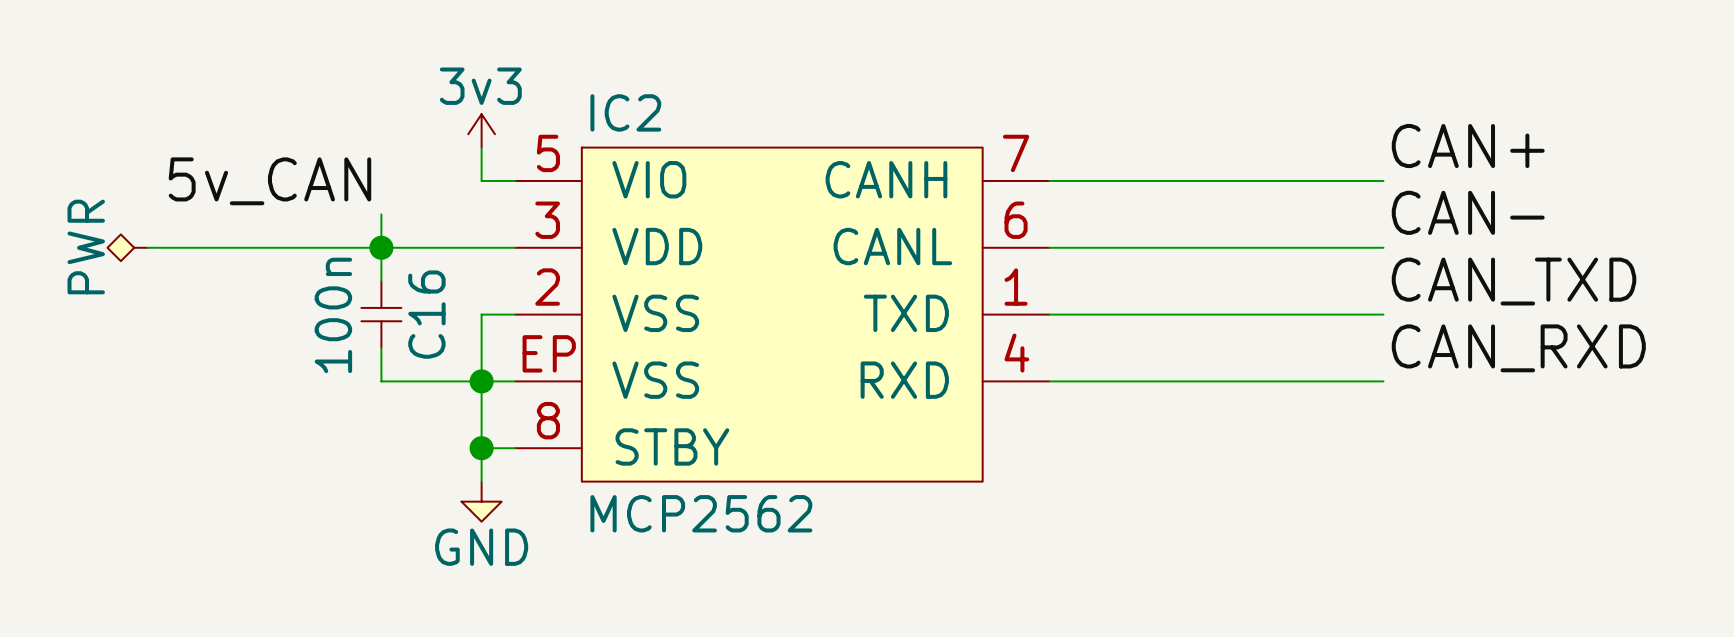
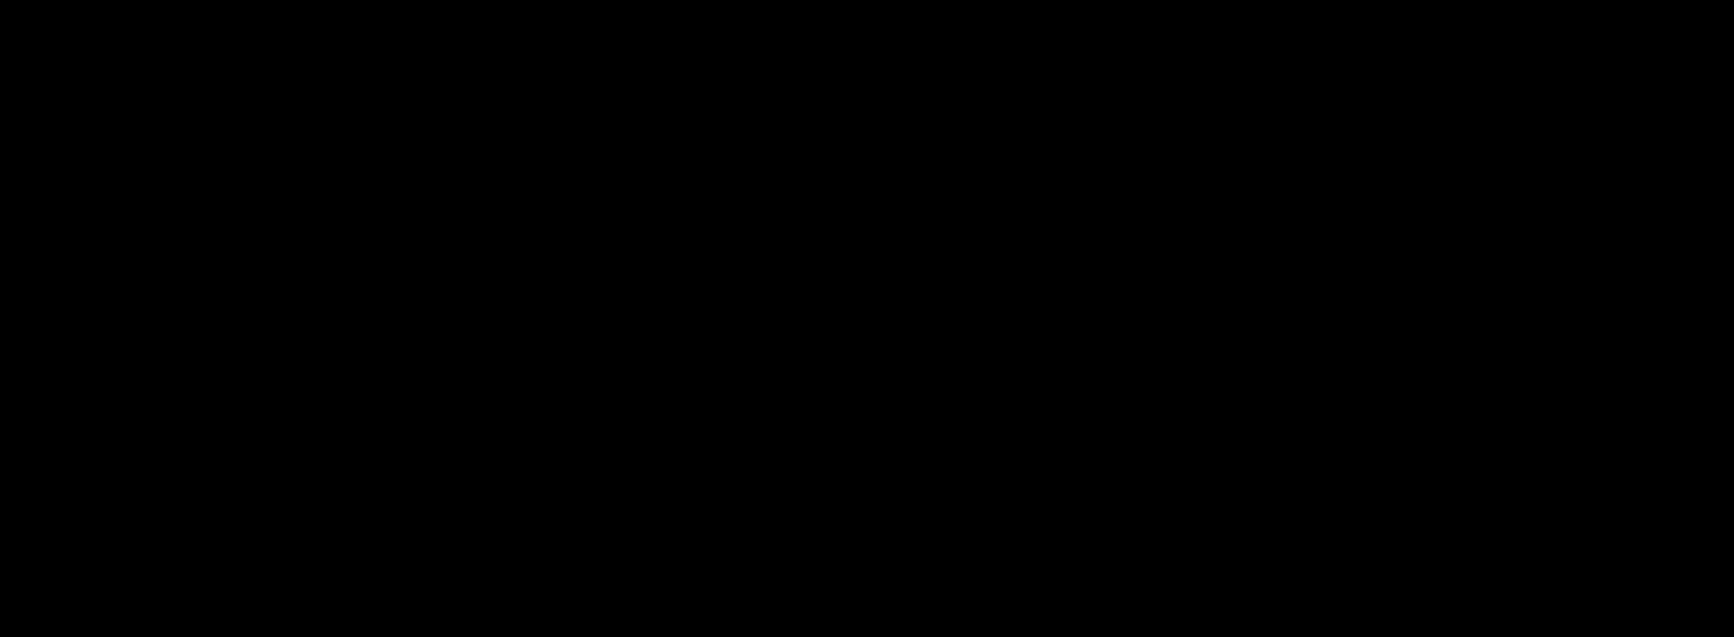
power symbol: 3v3 (481, 130) -> none
label: CAN+ (1468, 146) -> none
wire: (481, 147) (481, 180) (515, 180) -> none
wire: (1049, 180) (1383, 180) -> none
label: 5v_CAN (269, 181) -> none
label: CAN- (1468, 212) -> none
wire: (381, 214) (381, 281) -> none
power symbol: PWR (127, 247) -> none
wire: (147, 247) (515, 247) -> none
junction: (381, 247) -> none
wire: (1049, 247) (1383, 247) -> none
label: CAN_TXD (1514, 281) -> none
C16: 100n (381, 314) -> none
wire: (515, 314) (481, 314) (481, 481) -> none
IC2: MCP2562 (782, 314) -> none
wire: (1049, 314) (1383, 314) -> none
wire: (381, 348) (381, 381) (515, 381) -> none
label: CAN_RXD (1518, 348) -> none
junction: (481, 381) -> none
wire: (1049, 381) (1383, 381) -> none
wire: (481, 448) (515, 448) -> none
junction: (481, 448) -> none
power symbol: GND (481, 501) -> none

